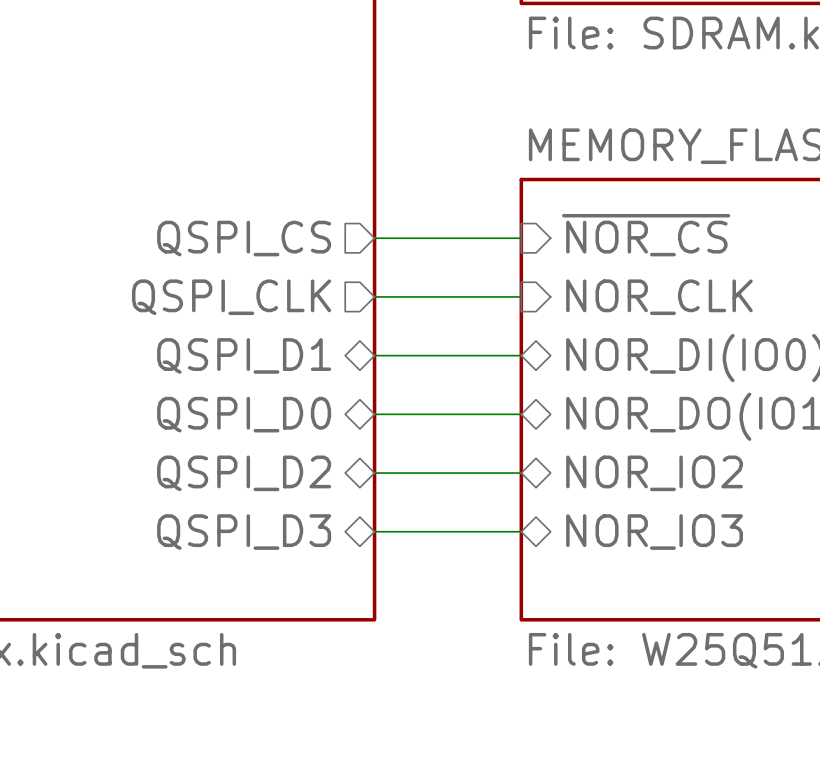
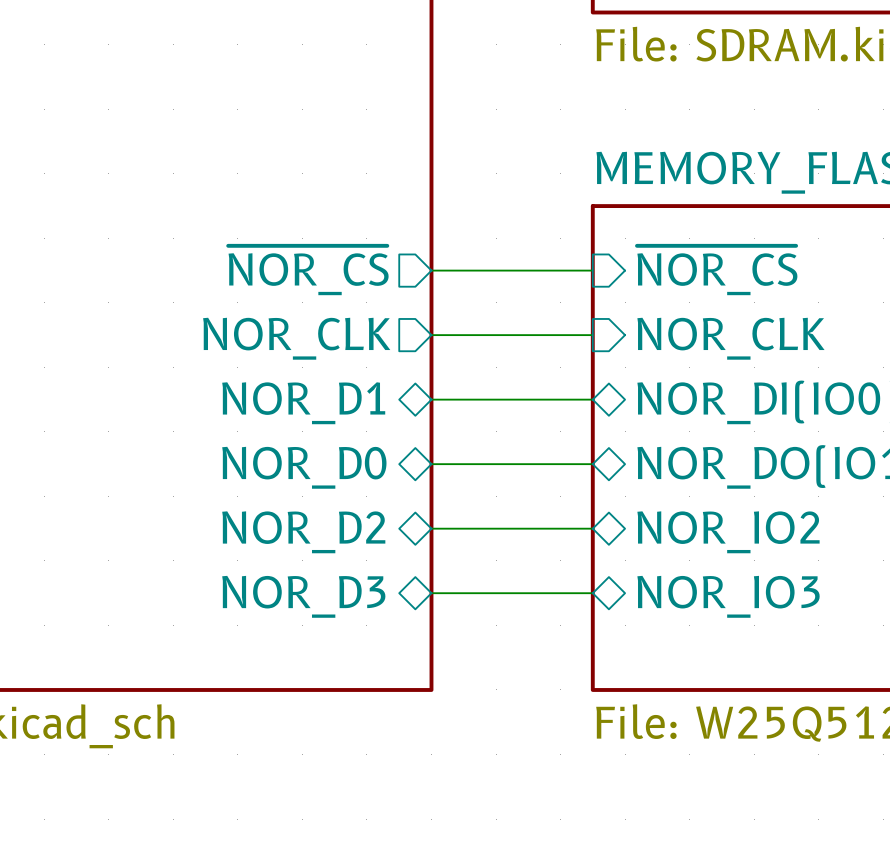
sheet pin: QSPI_CS (244, 238) -> ~{NOR_CS} (308, 270)
sheet pin: QSPI_CLK (231, 297) -> NOR_CLK (296, 338)
sheet pin: QSPI_D1 (244, 355) -> NOR_D1 (303, 403)
sheet pin: QSPI_D0 (244, 414) -> NOR_D0 (304, 467)
sheet pin: QSPI_D2 (244, 473) -> NOR_D2 (303, 532)
sheet pin: QSPI_D3 (244, 532) -> NOR_D3 (303, 596)

